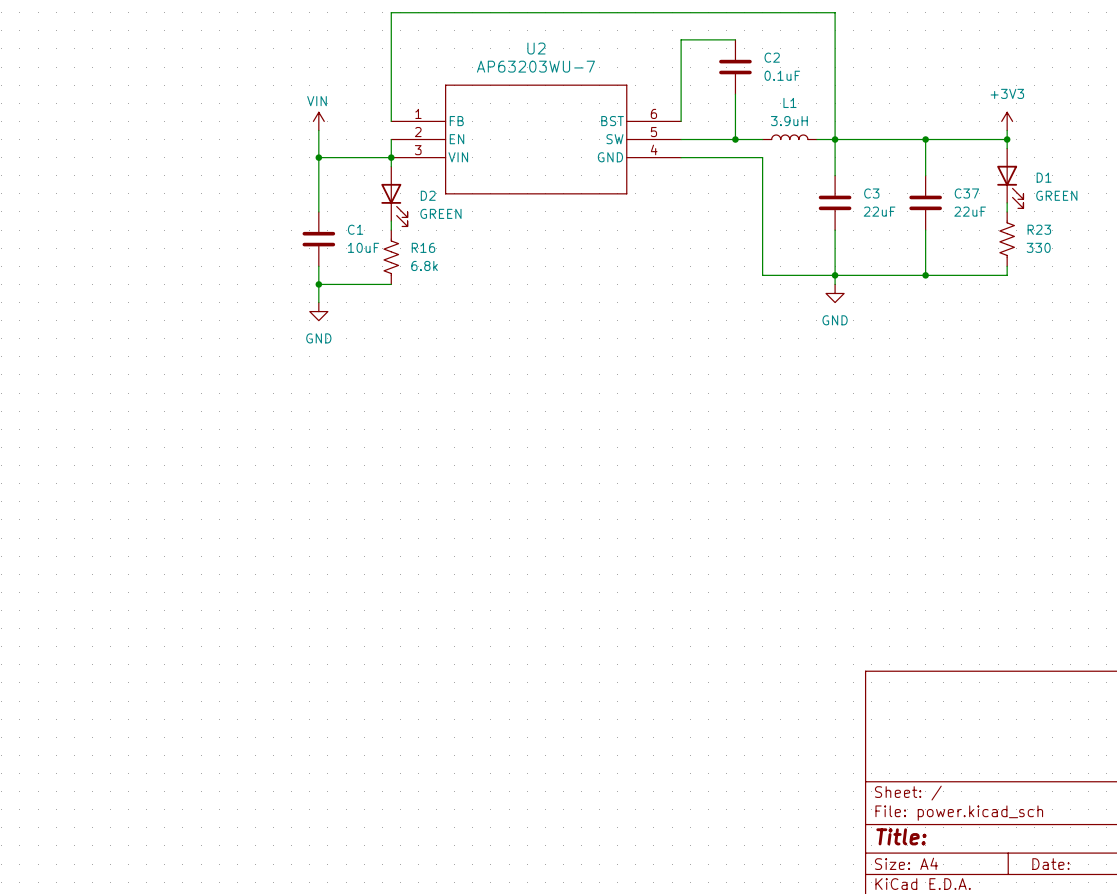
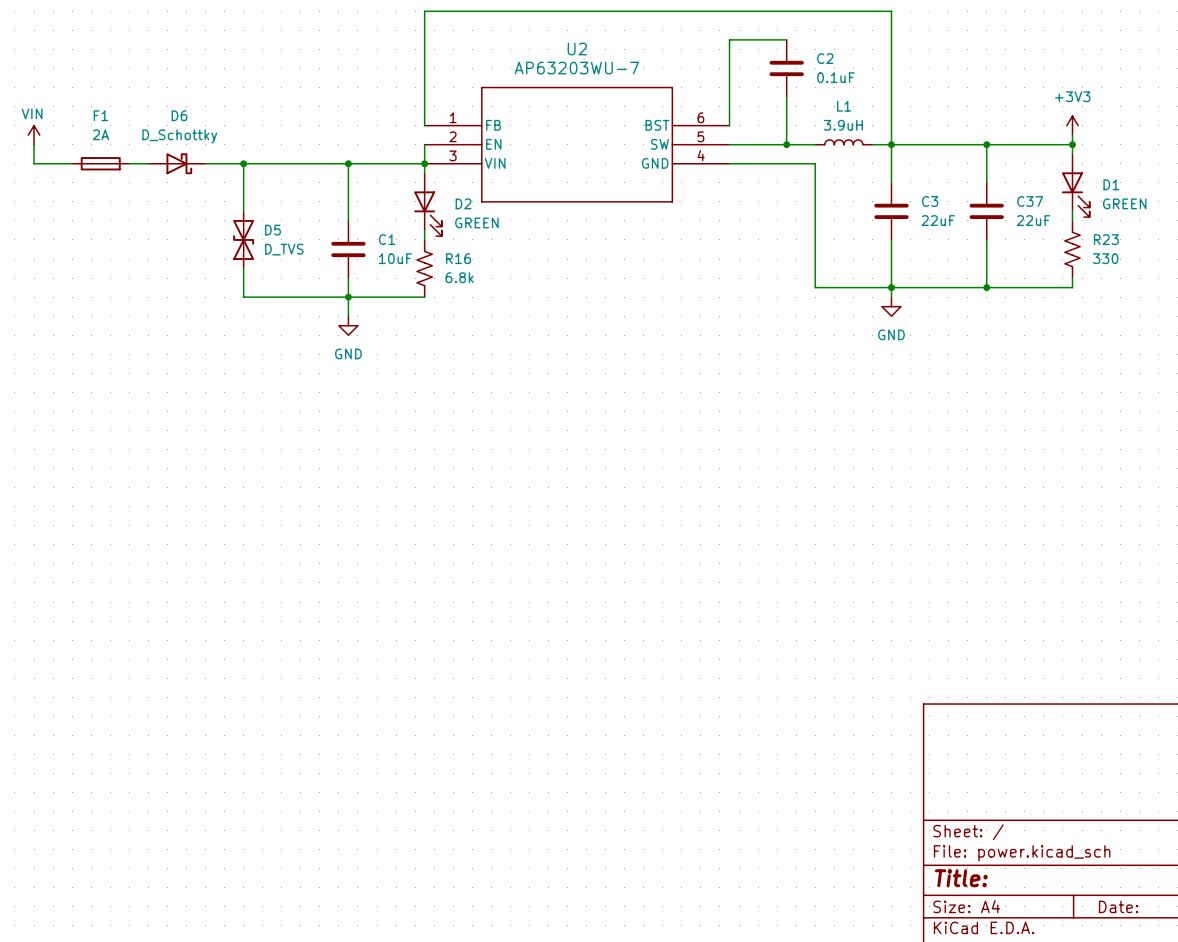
power symbol: VIN (318, 121) -> none
power symbol: none -> VIN (34, 135)
wire: (318, 130) (318, 157) -> (205, 163) (348, 163)
wire: none -> (34, 144) (34, 163) (72, 163)
F1: none -> 2A (100, 163)
wire: none -> (129, 163) (148, 163)
D6: none -> D_Schottky (176, 163)
wire: none -> (243, 163) (243, 211)
junction: none -> (243, 163)
D5: none -> D_TVS (243, 239)
wire: none -> (243, 268) (243, 297) (348, 297)

